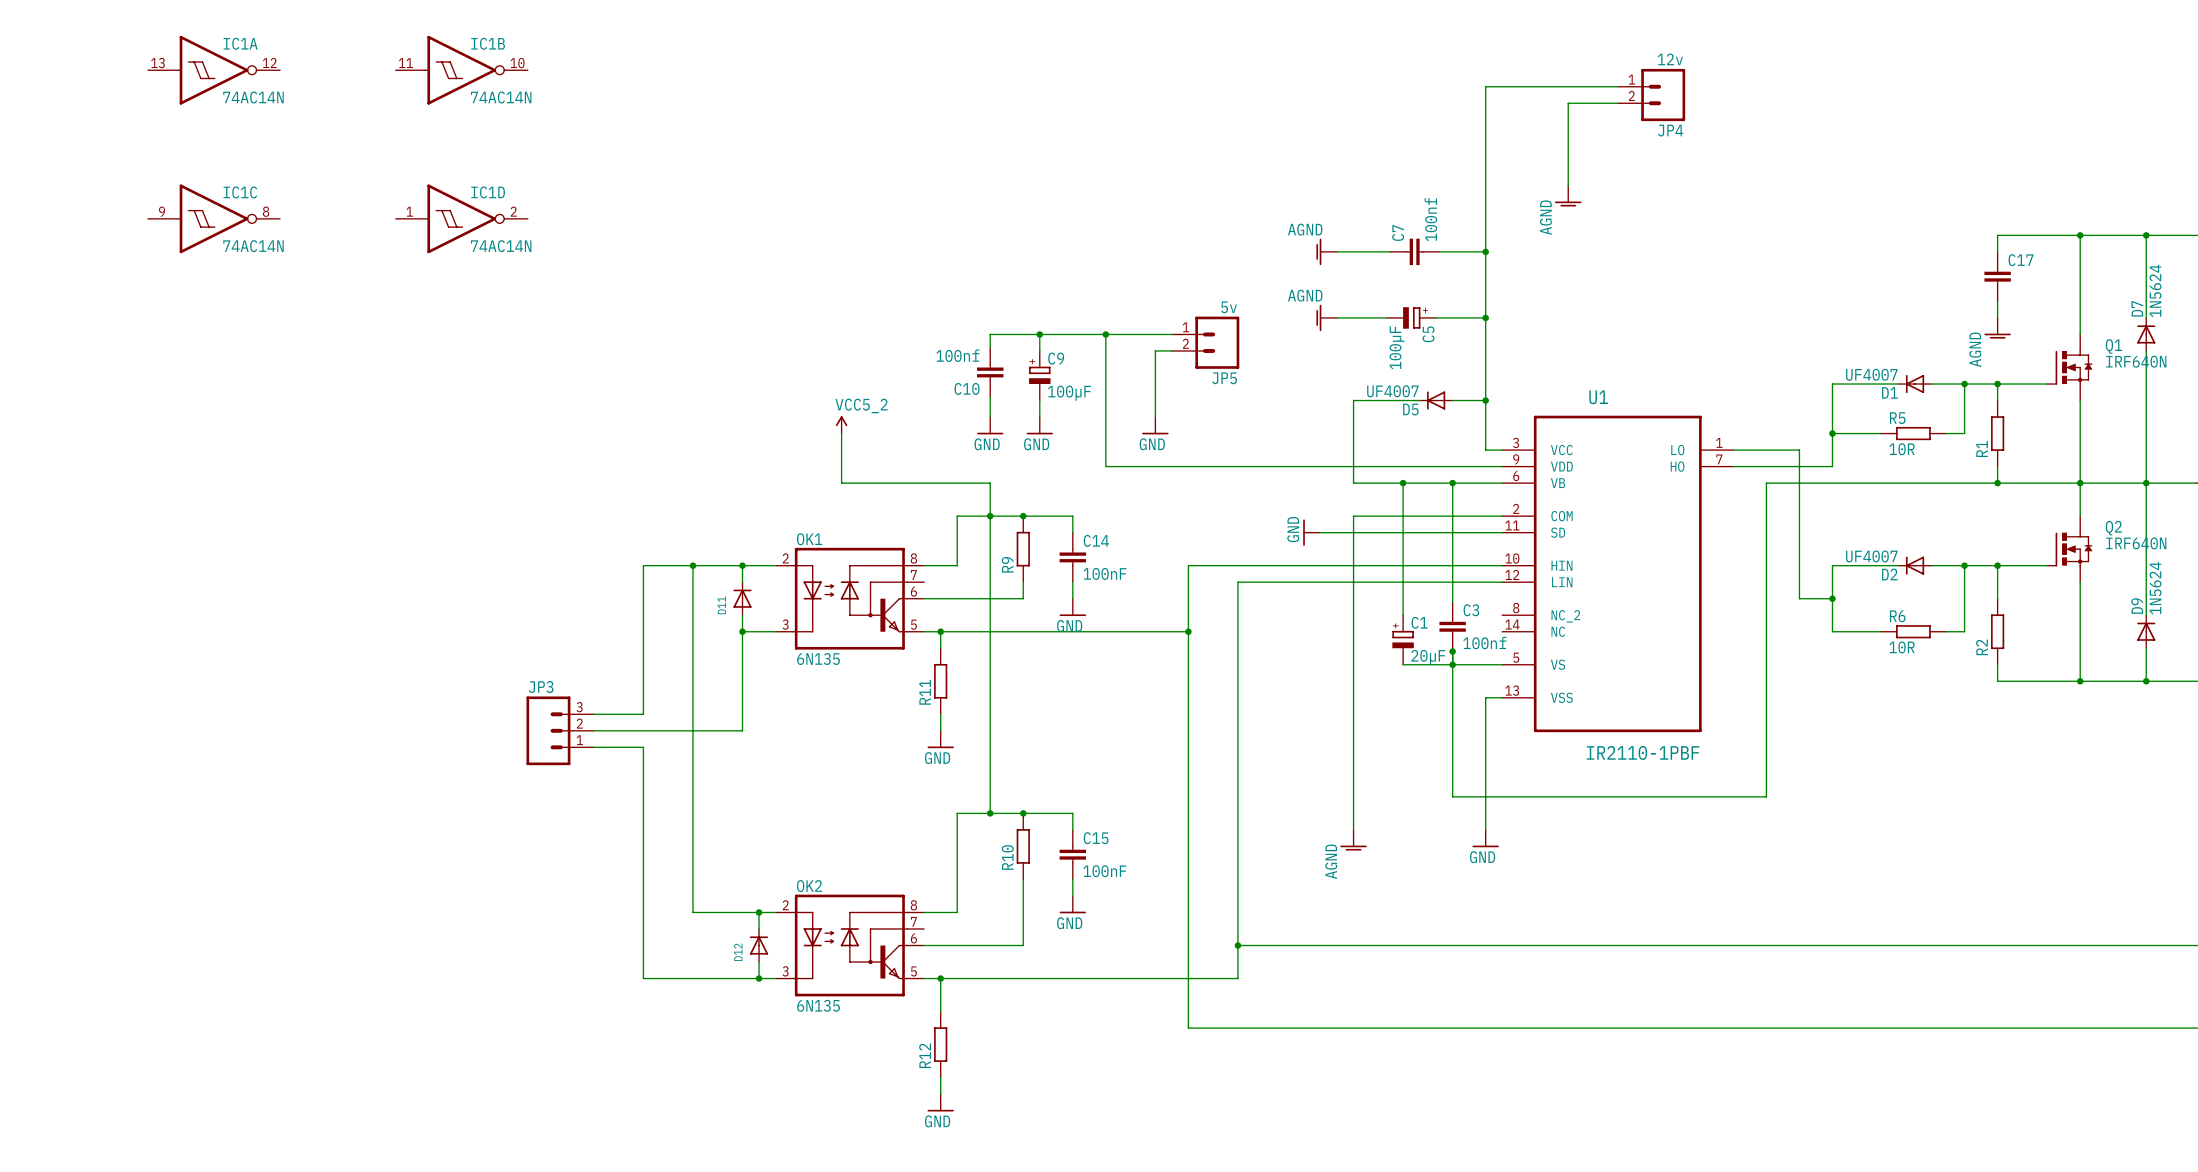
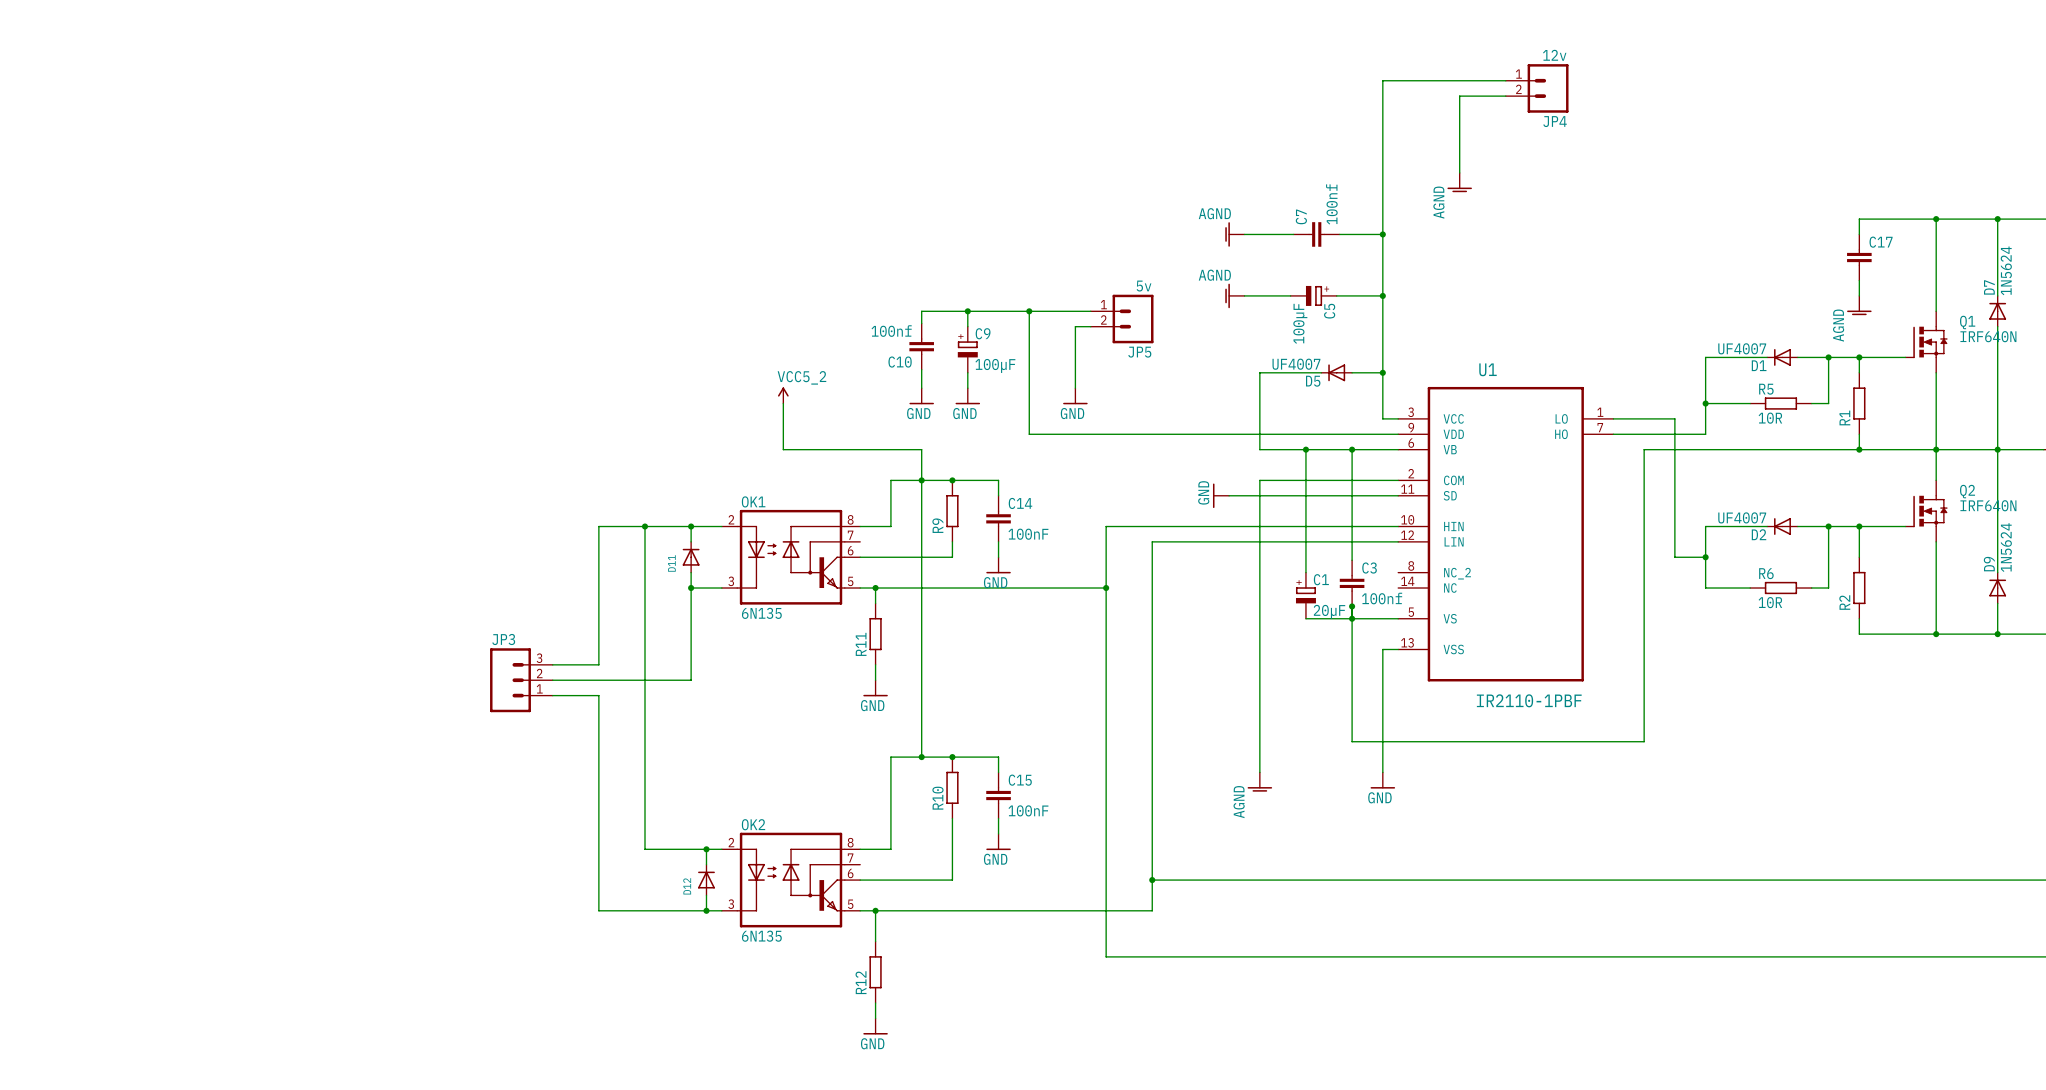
IC1A: 74AC14N (214, 70) -> none
IC1B: 74AC14N (461, 70) -> none
IC1C: 74AC14N (214, 218) -> none
IC1D: 74AC14N (461, 218) -> none

